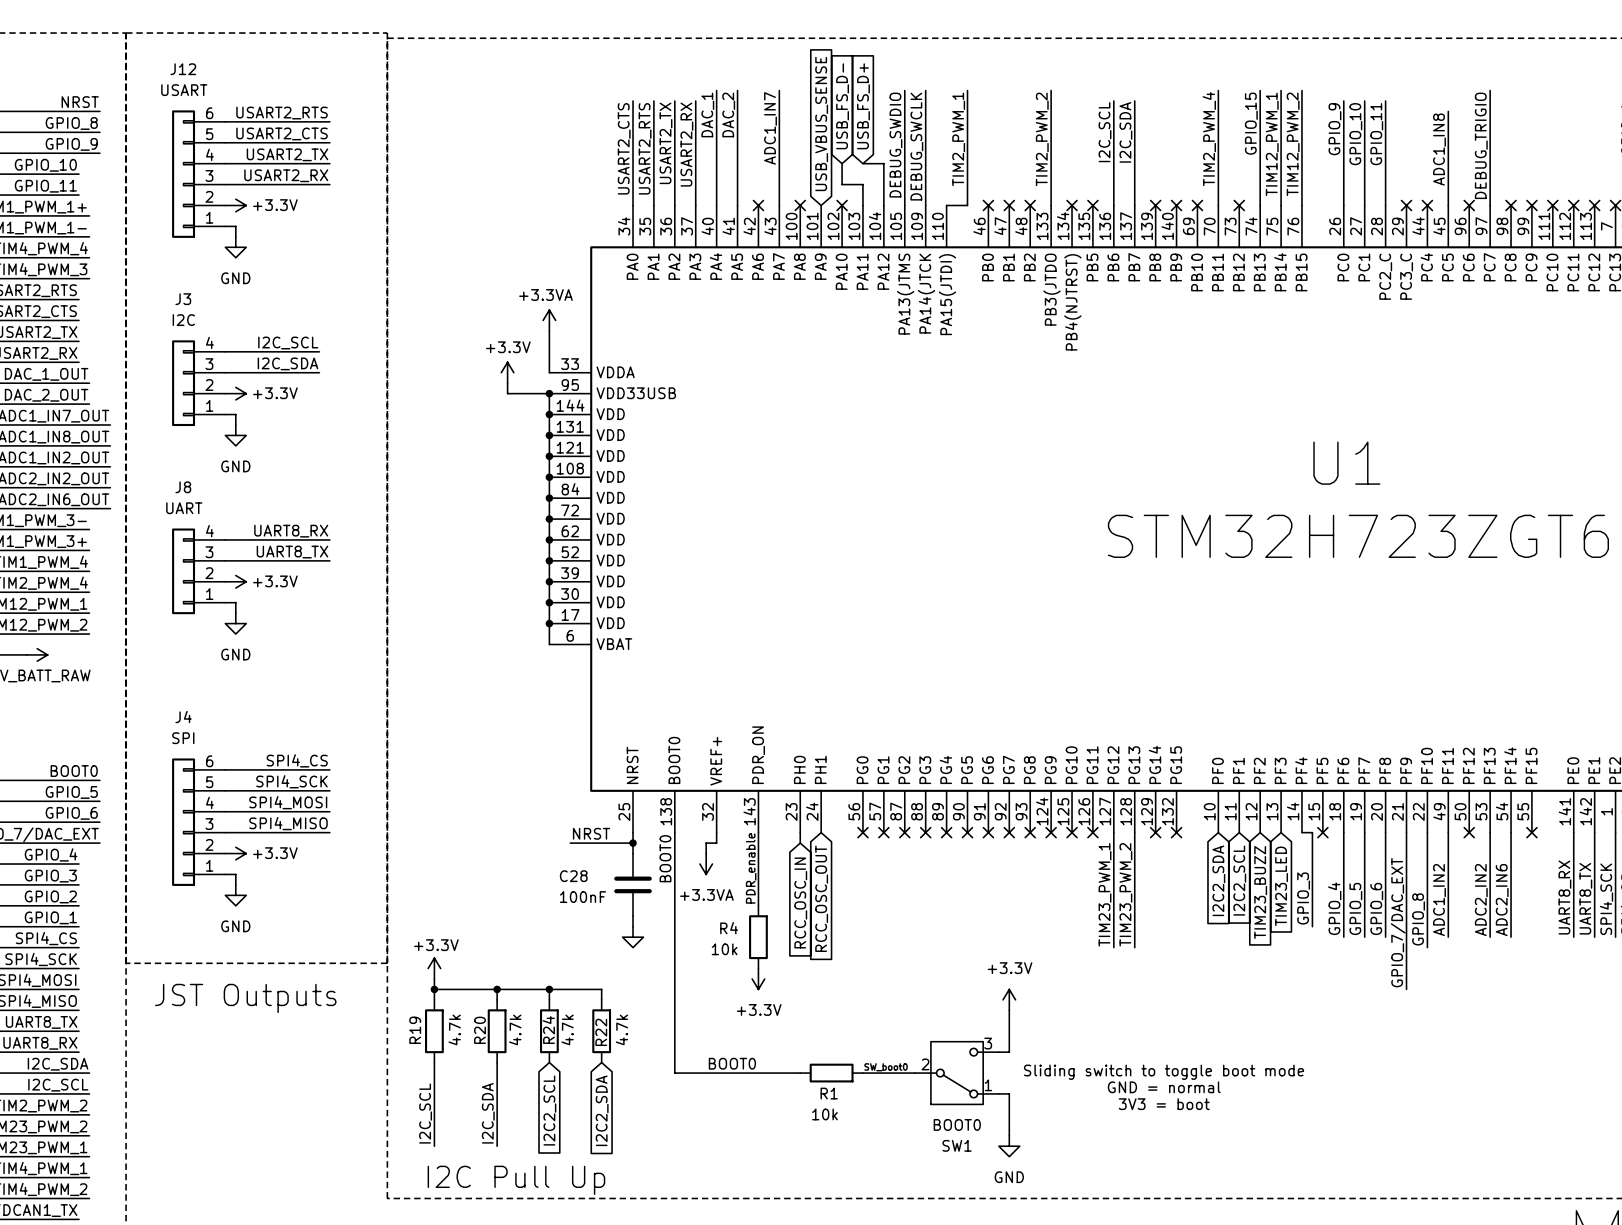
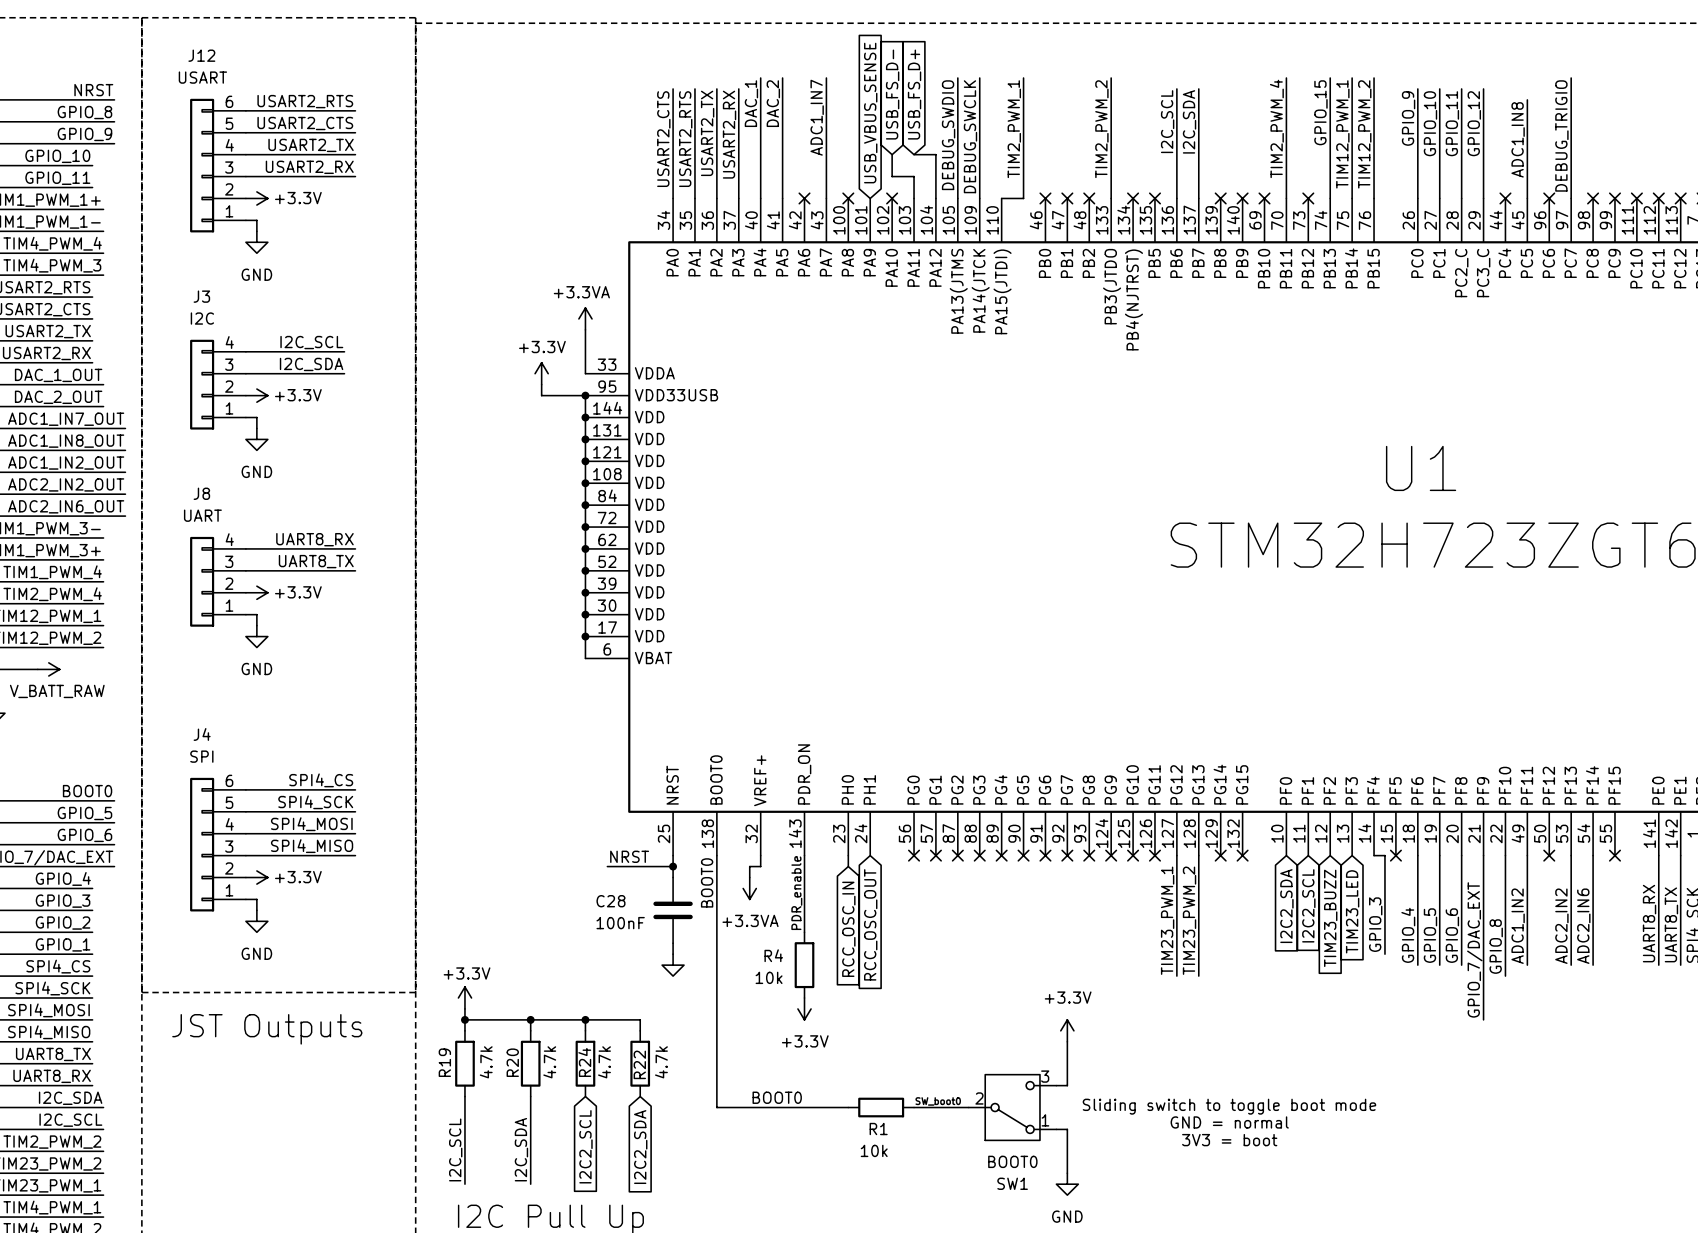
wire: none -> (1483, 88) (1483, 198)
label: none -> GPIO_12 (1474, 123)
no-connect mark: (1406, 205) -> none

